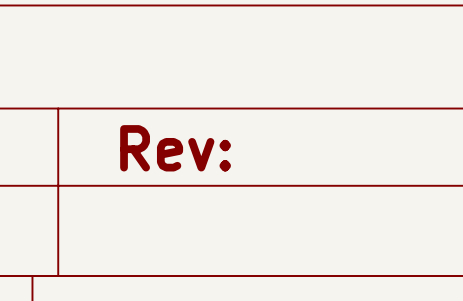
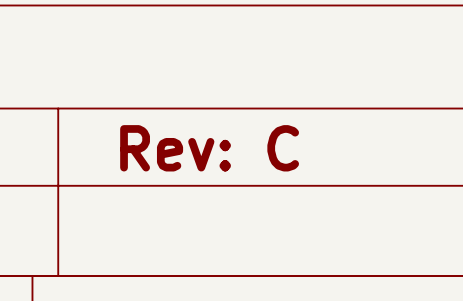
title block: Rev: (175, 148) -> Rev: C (209, 148)

